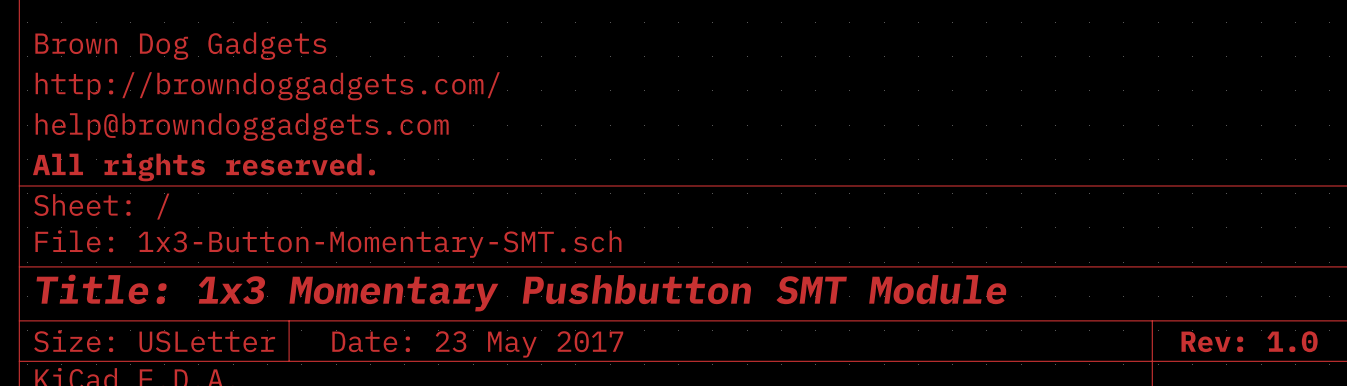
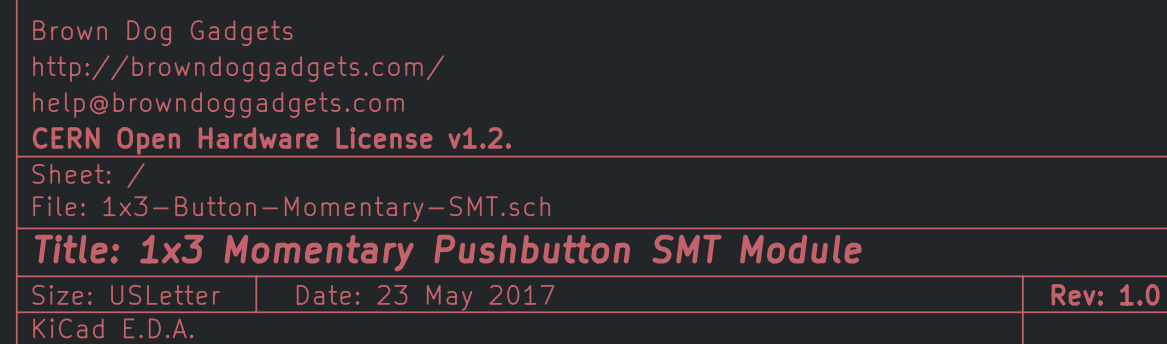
title block: All rights reserved. (203, 167) -> CERN Open Hardware License v1.2. (271, 140)

